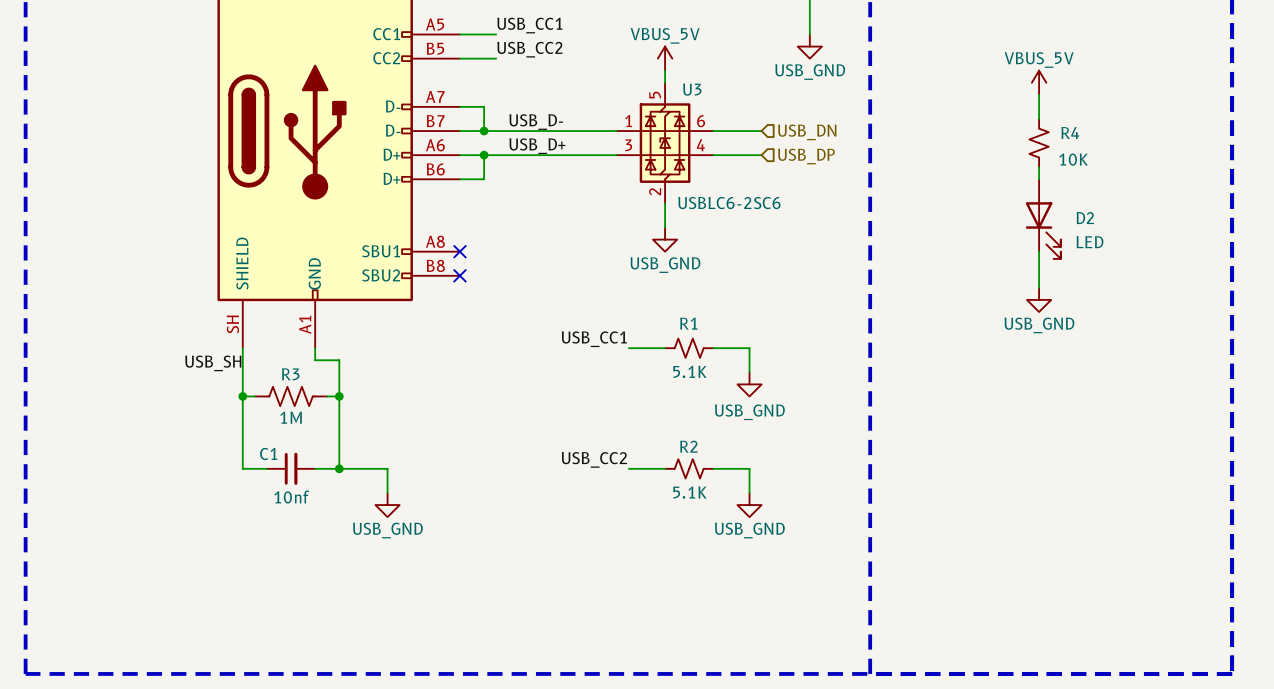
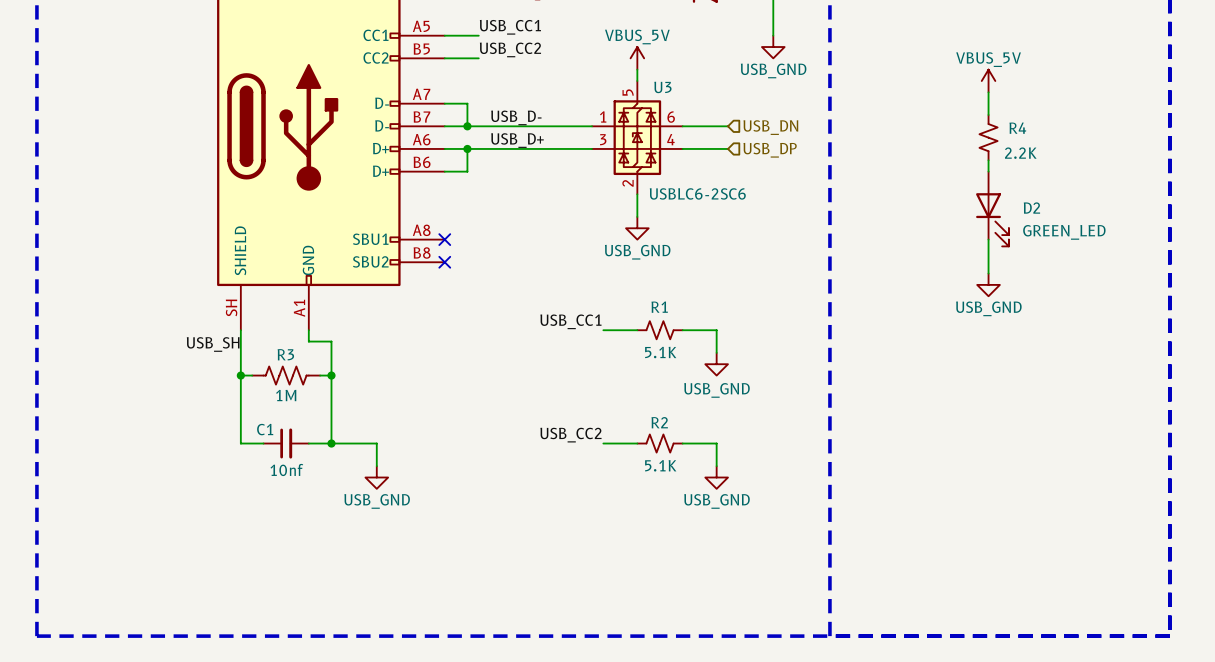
R4 value: 10K (1073, 159) -> 2.2K (1020, 153)
D2 value: LED (1089, 242) -> GREEN_LED (1064, 232)

